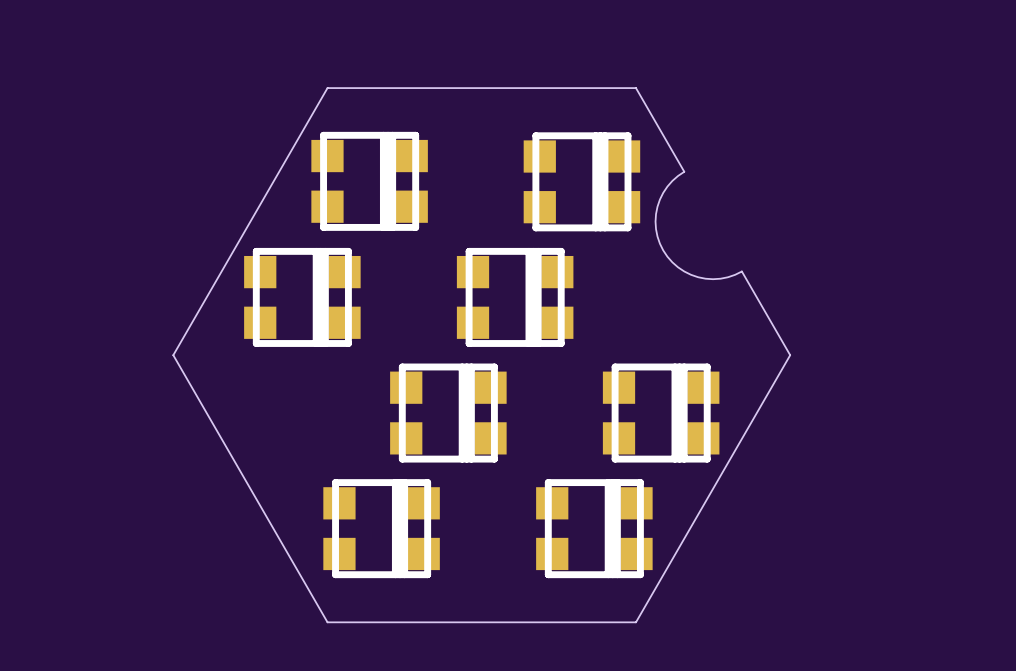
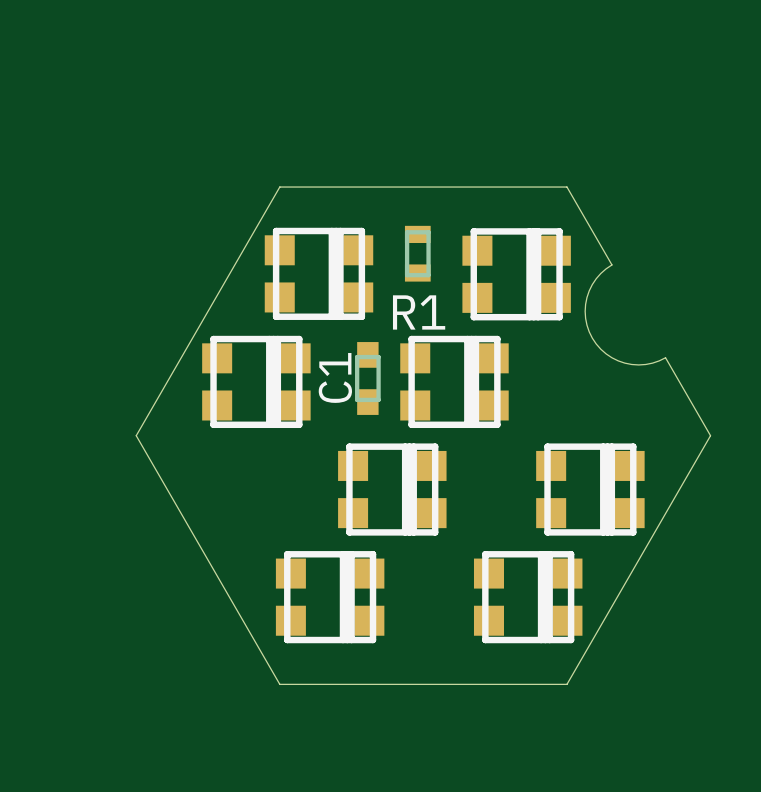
R1: none -> (417, 253)
C1: none -> (367, 378)

